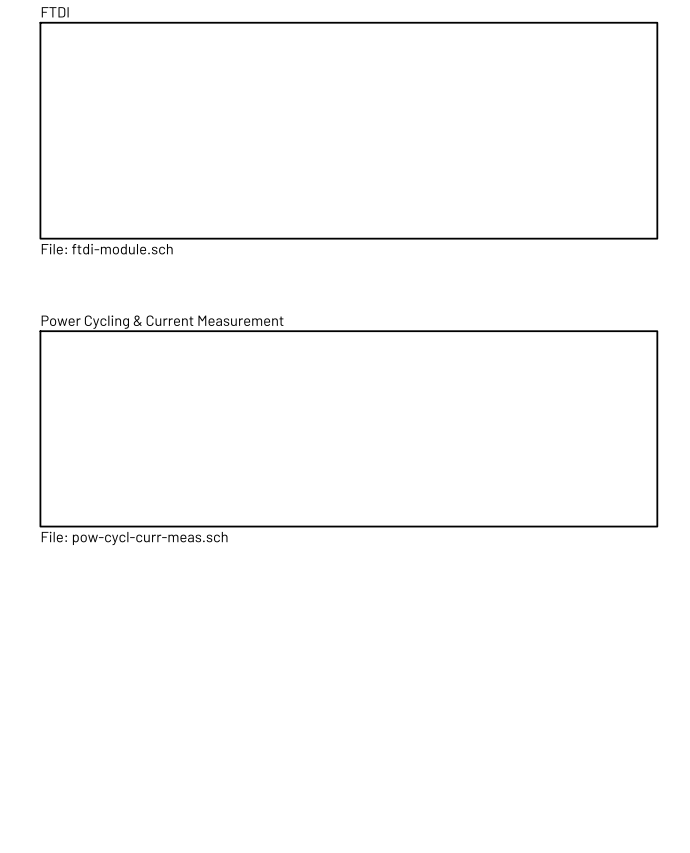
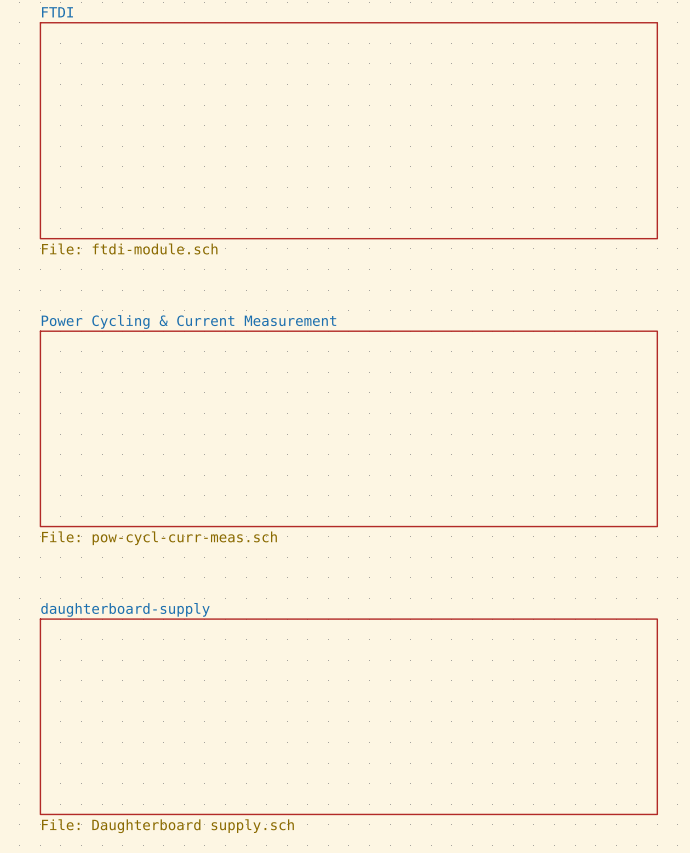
sheet daughterboard-supply: none -> File: Daughterboard supply.sch (348, 716)

